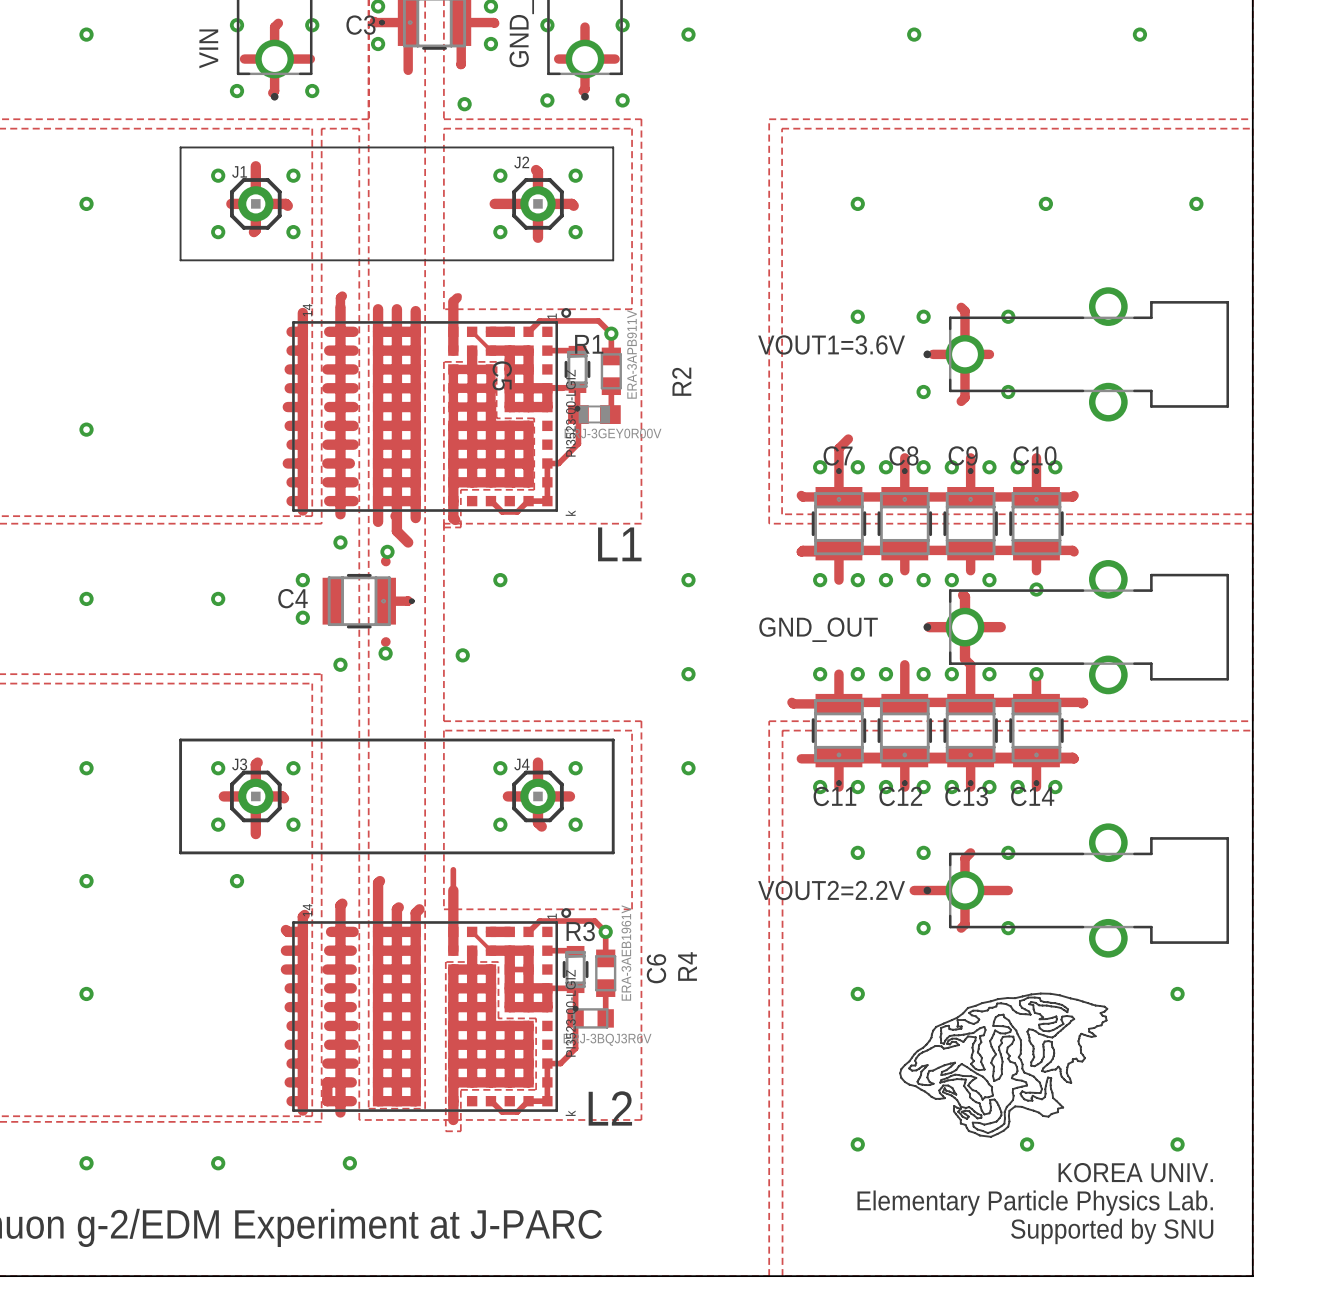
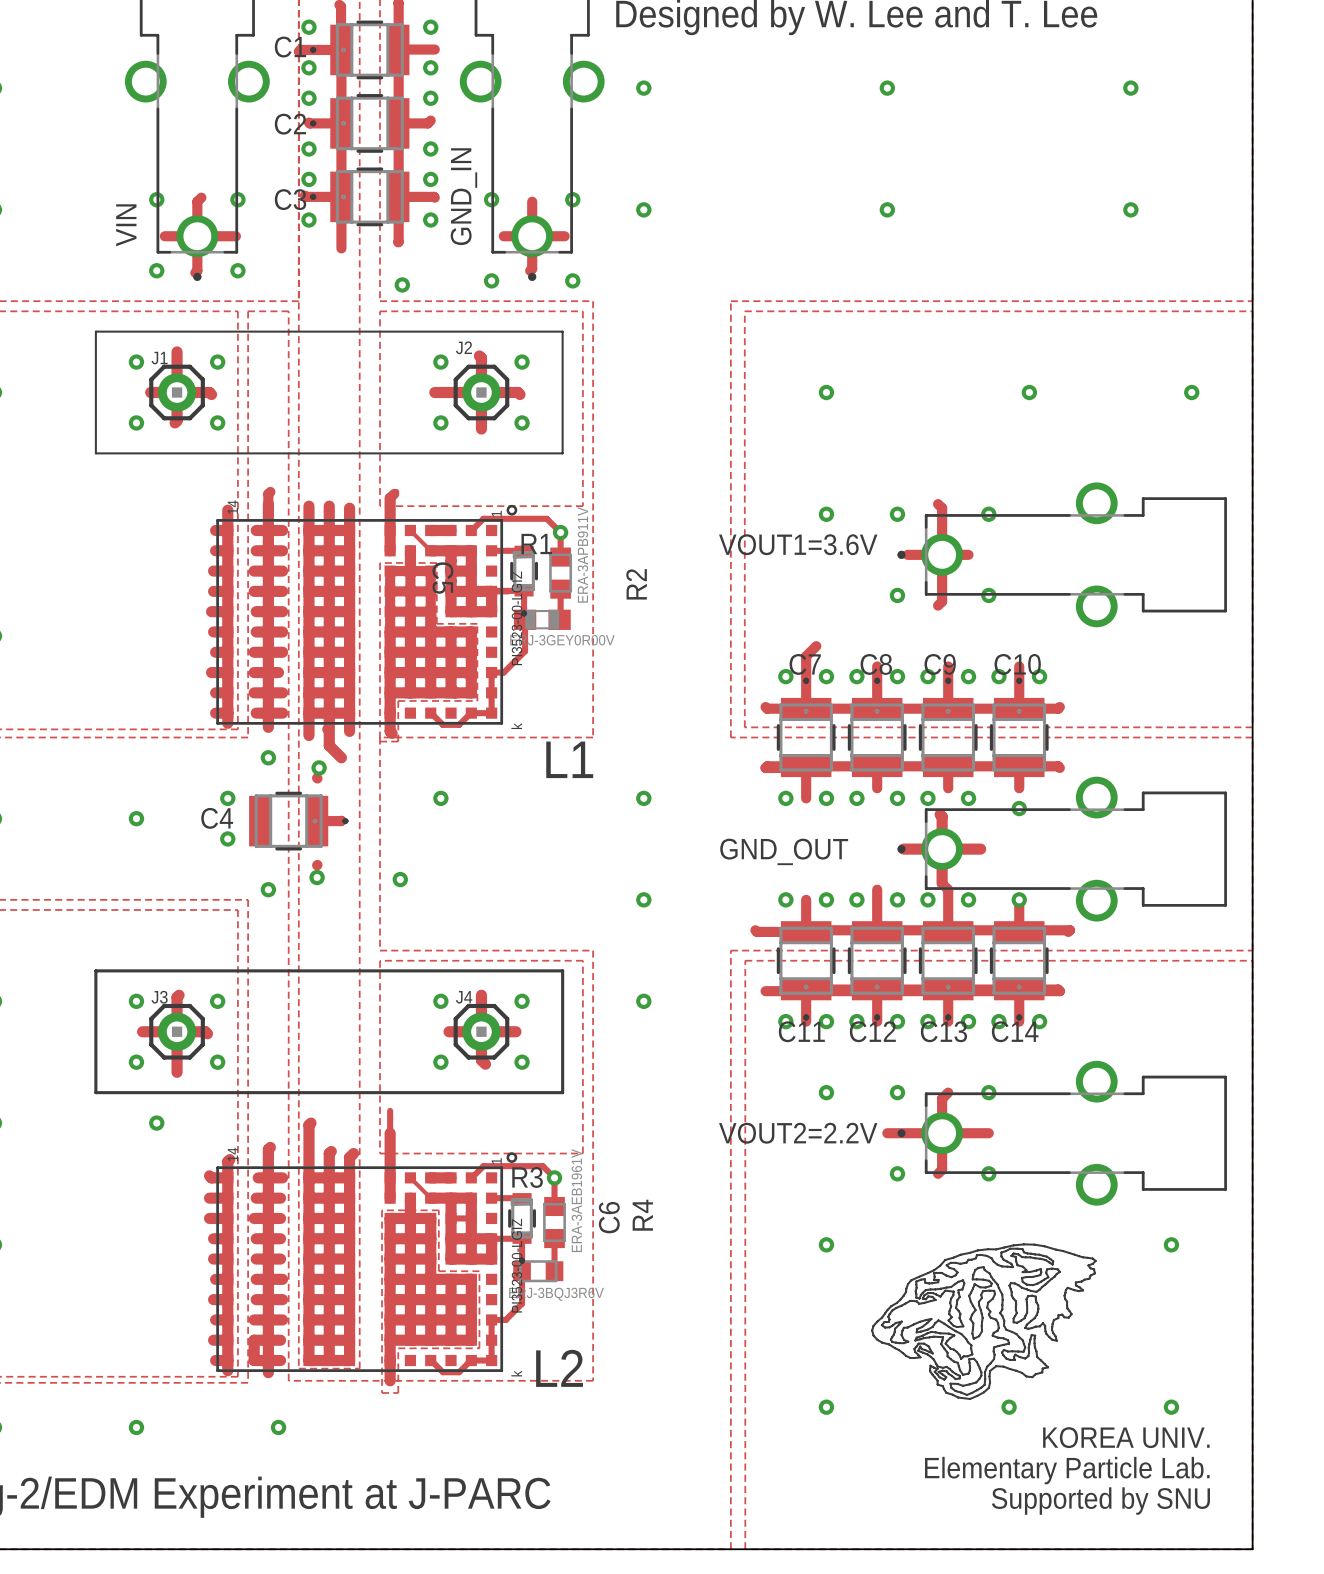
text: Elementary Particle Physics Lab. (1035, 1203) -> Elementary Particle Lab. (1067, 1470)

